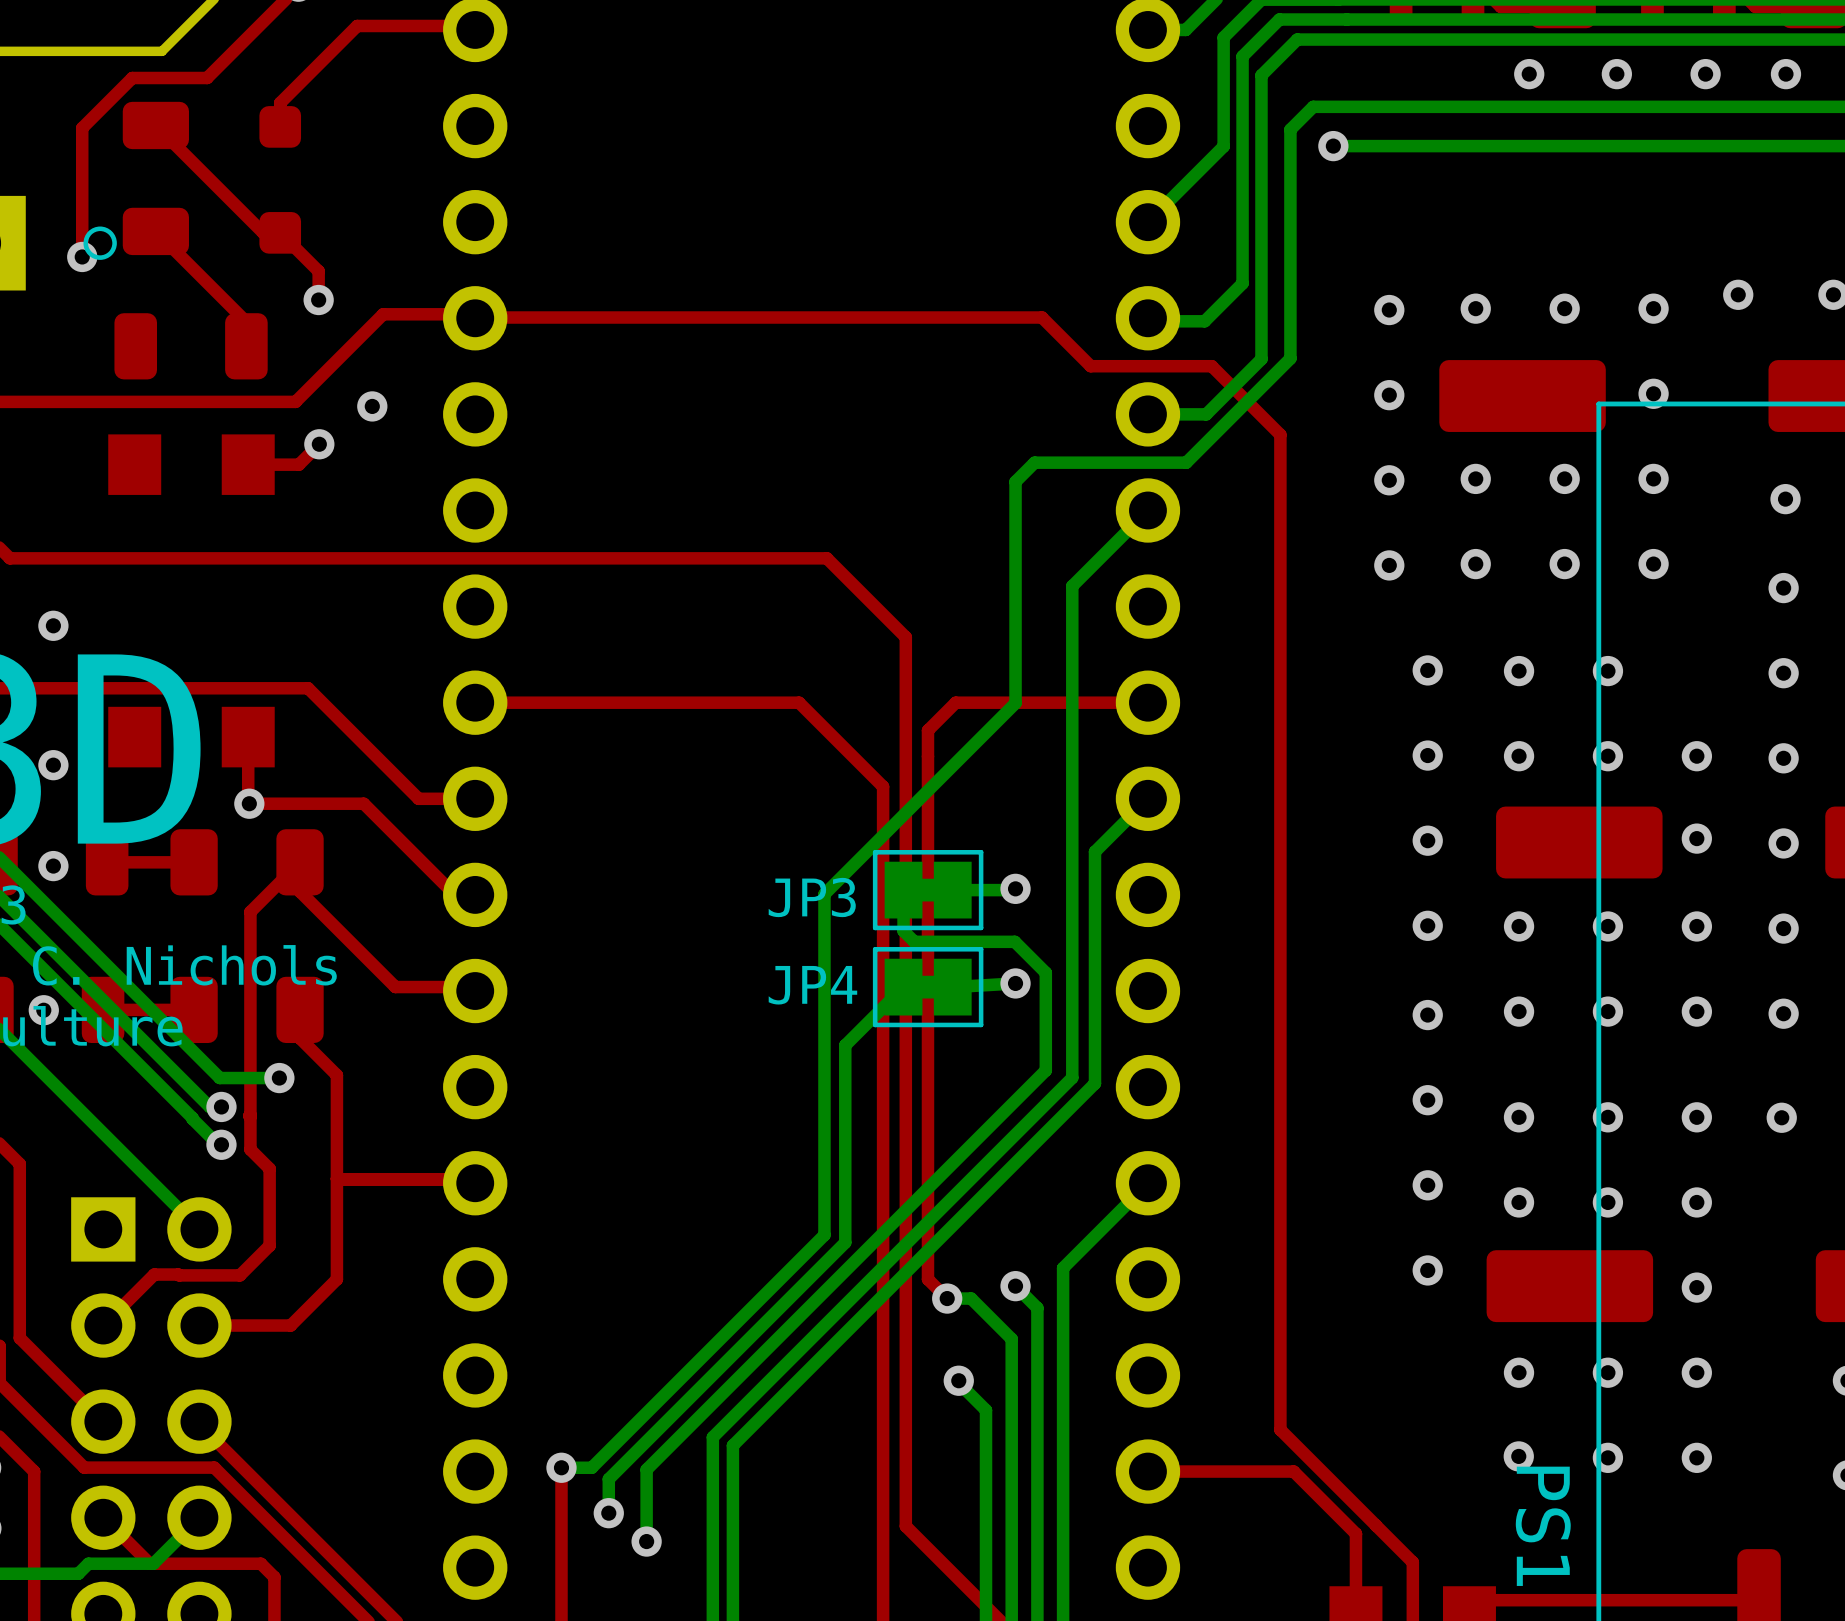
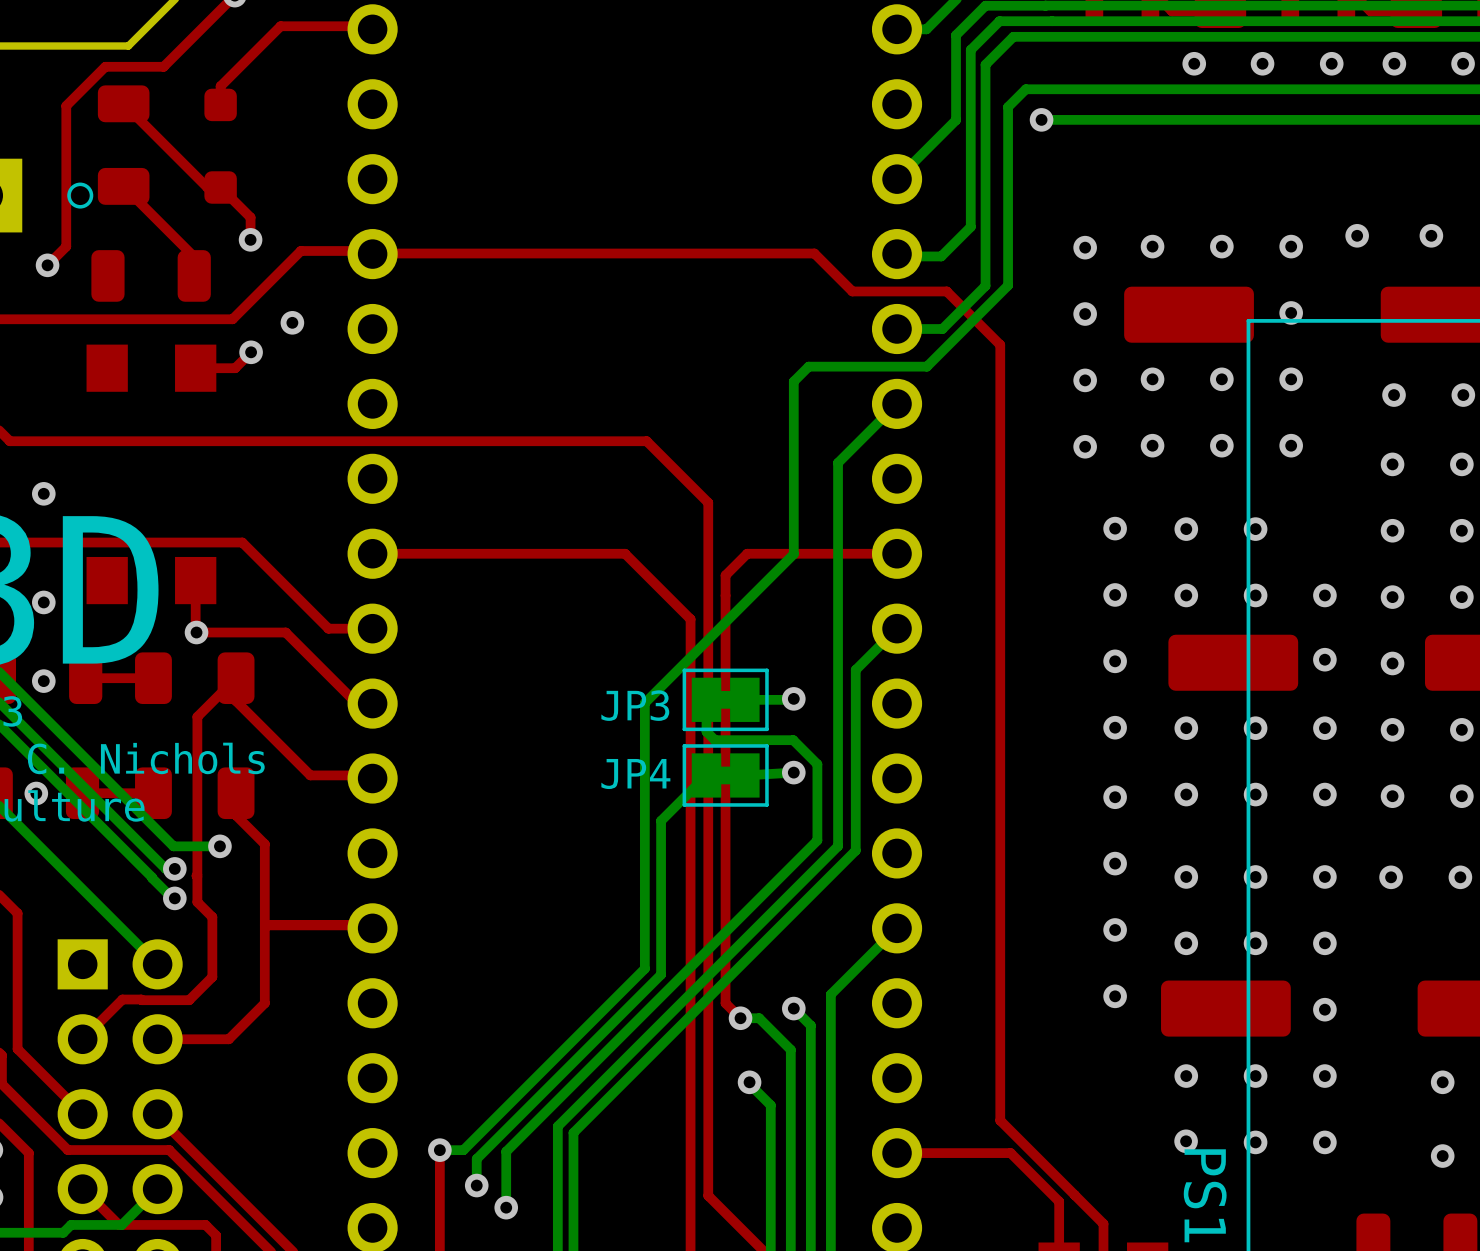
top track: none -> (66, 206) (66, 246) (47, 265)
via position: (82, 256) -> (47, 265)

